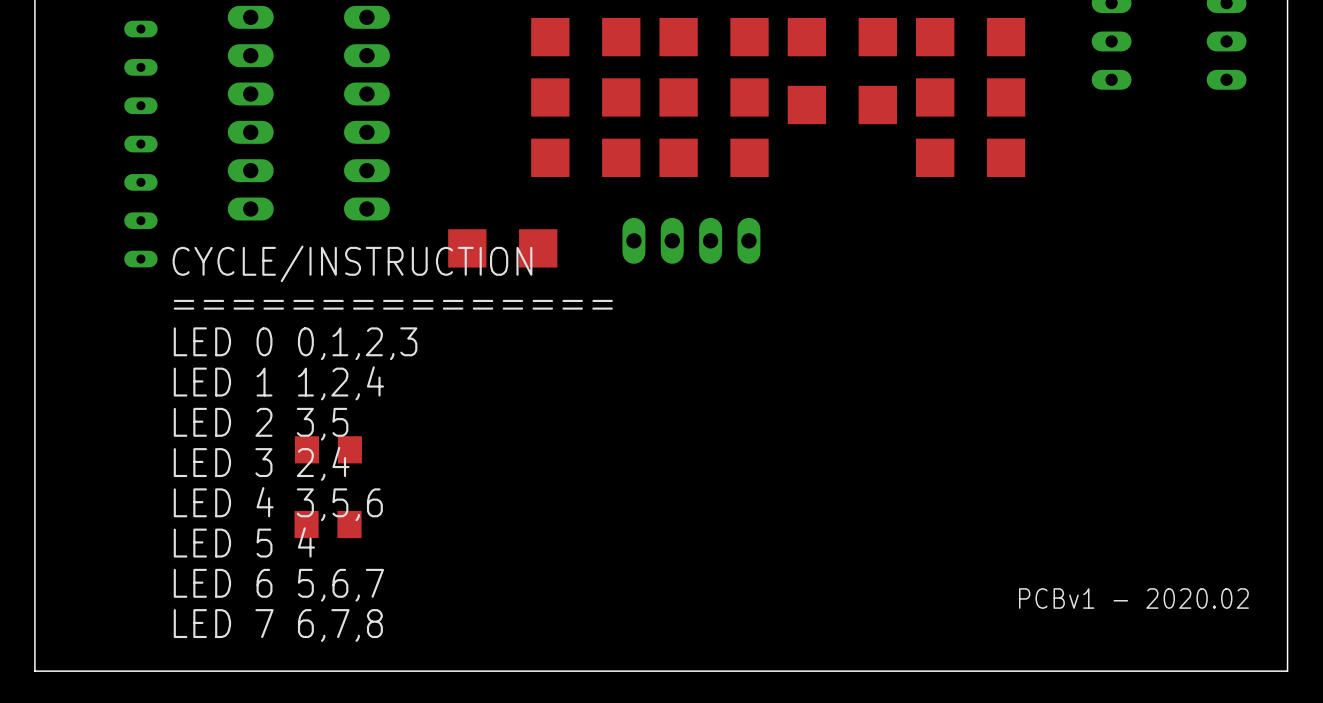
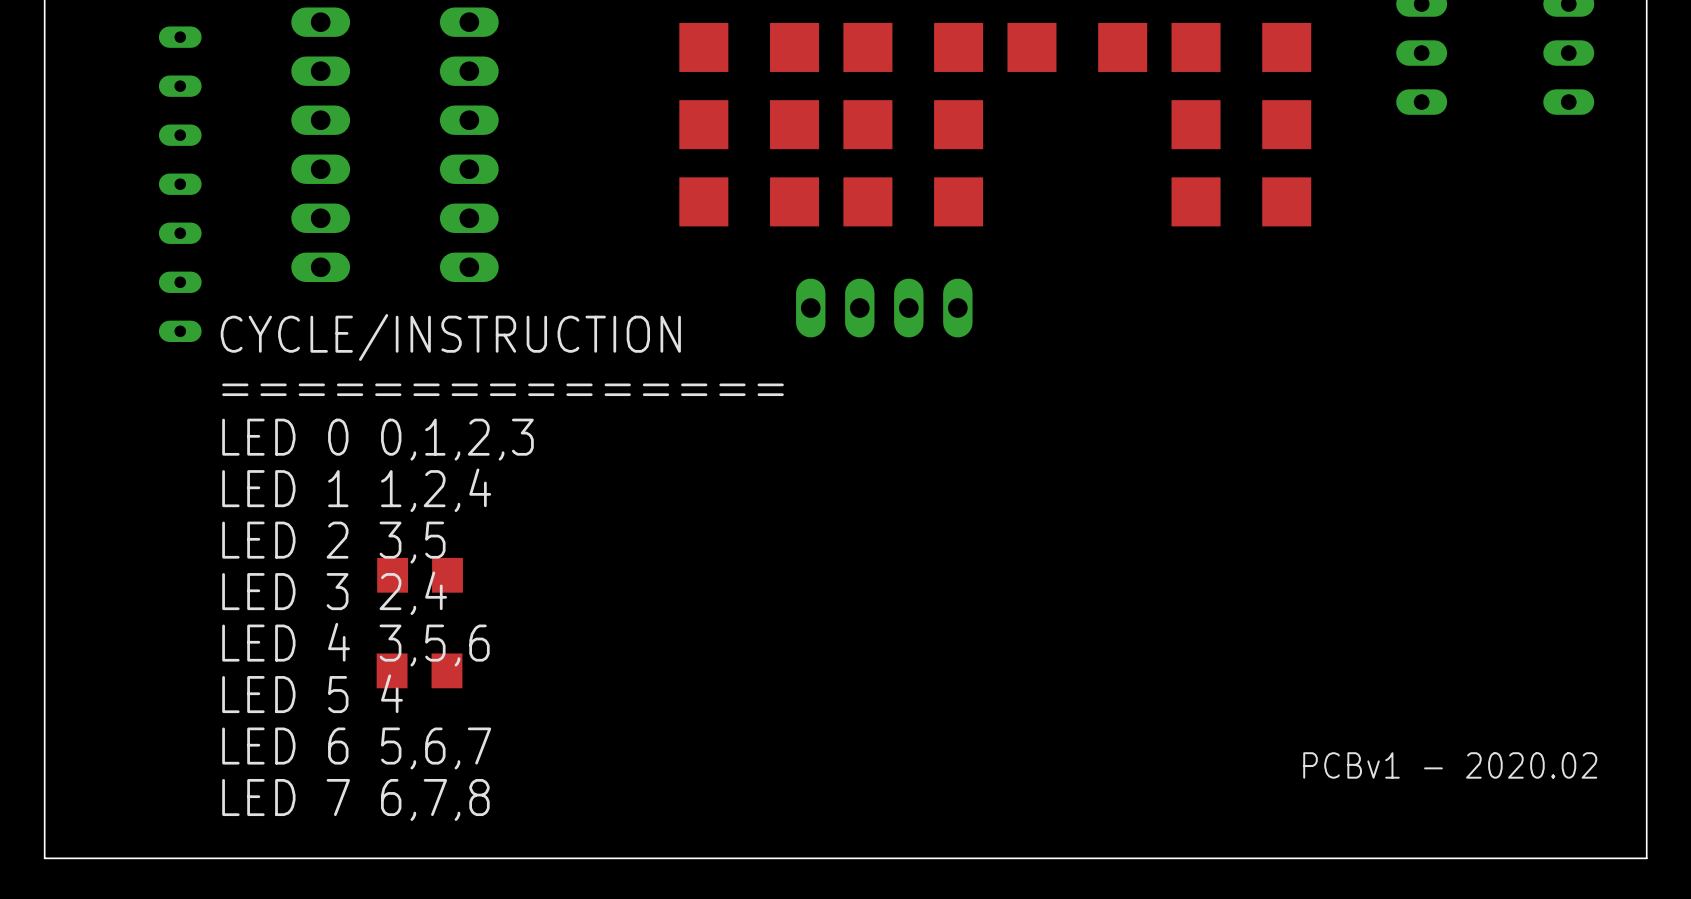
part: (842, 105) -> none
part: (502, 248) -> none

